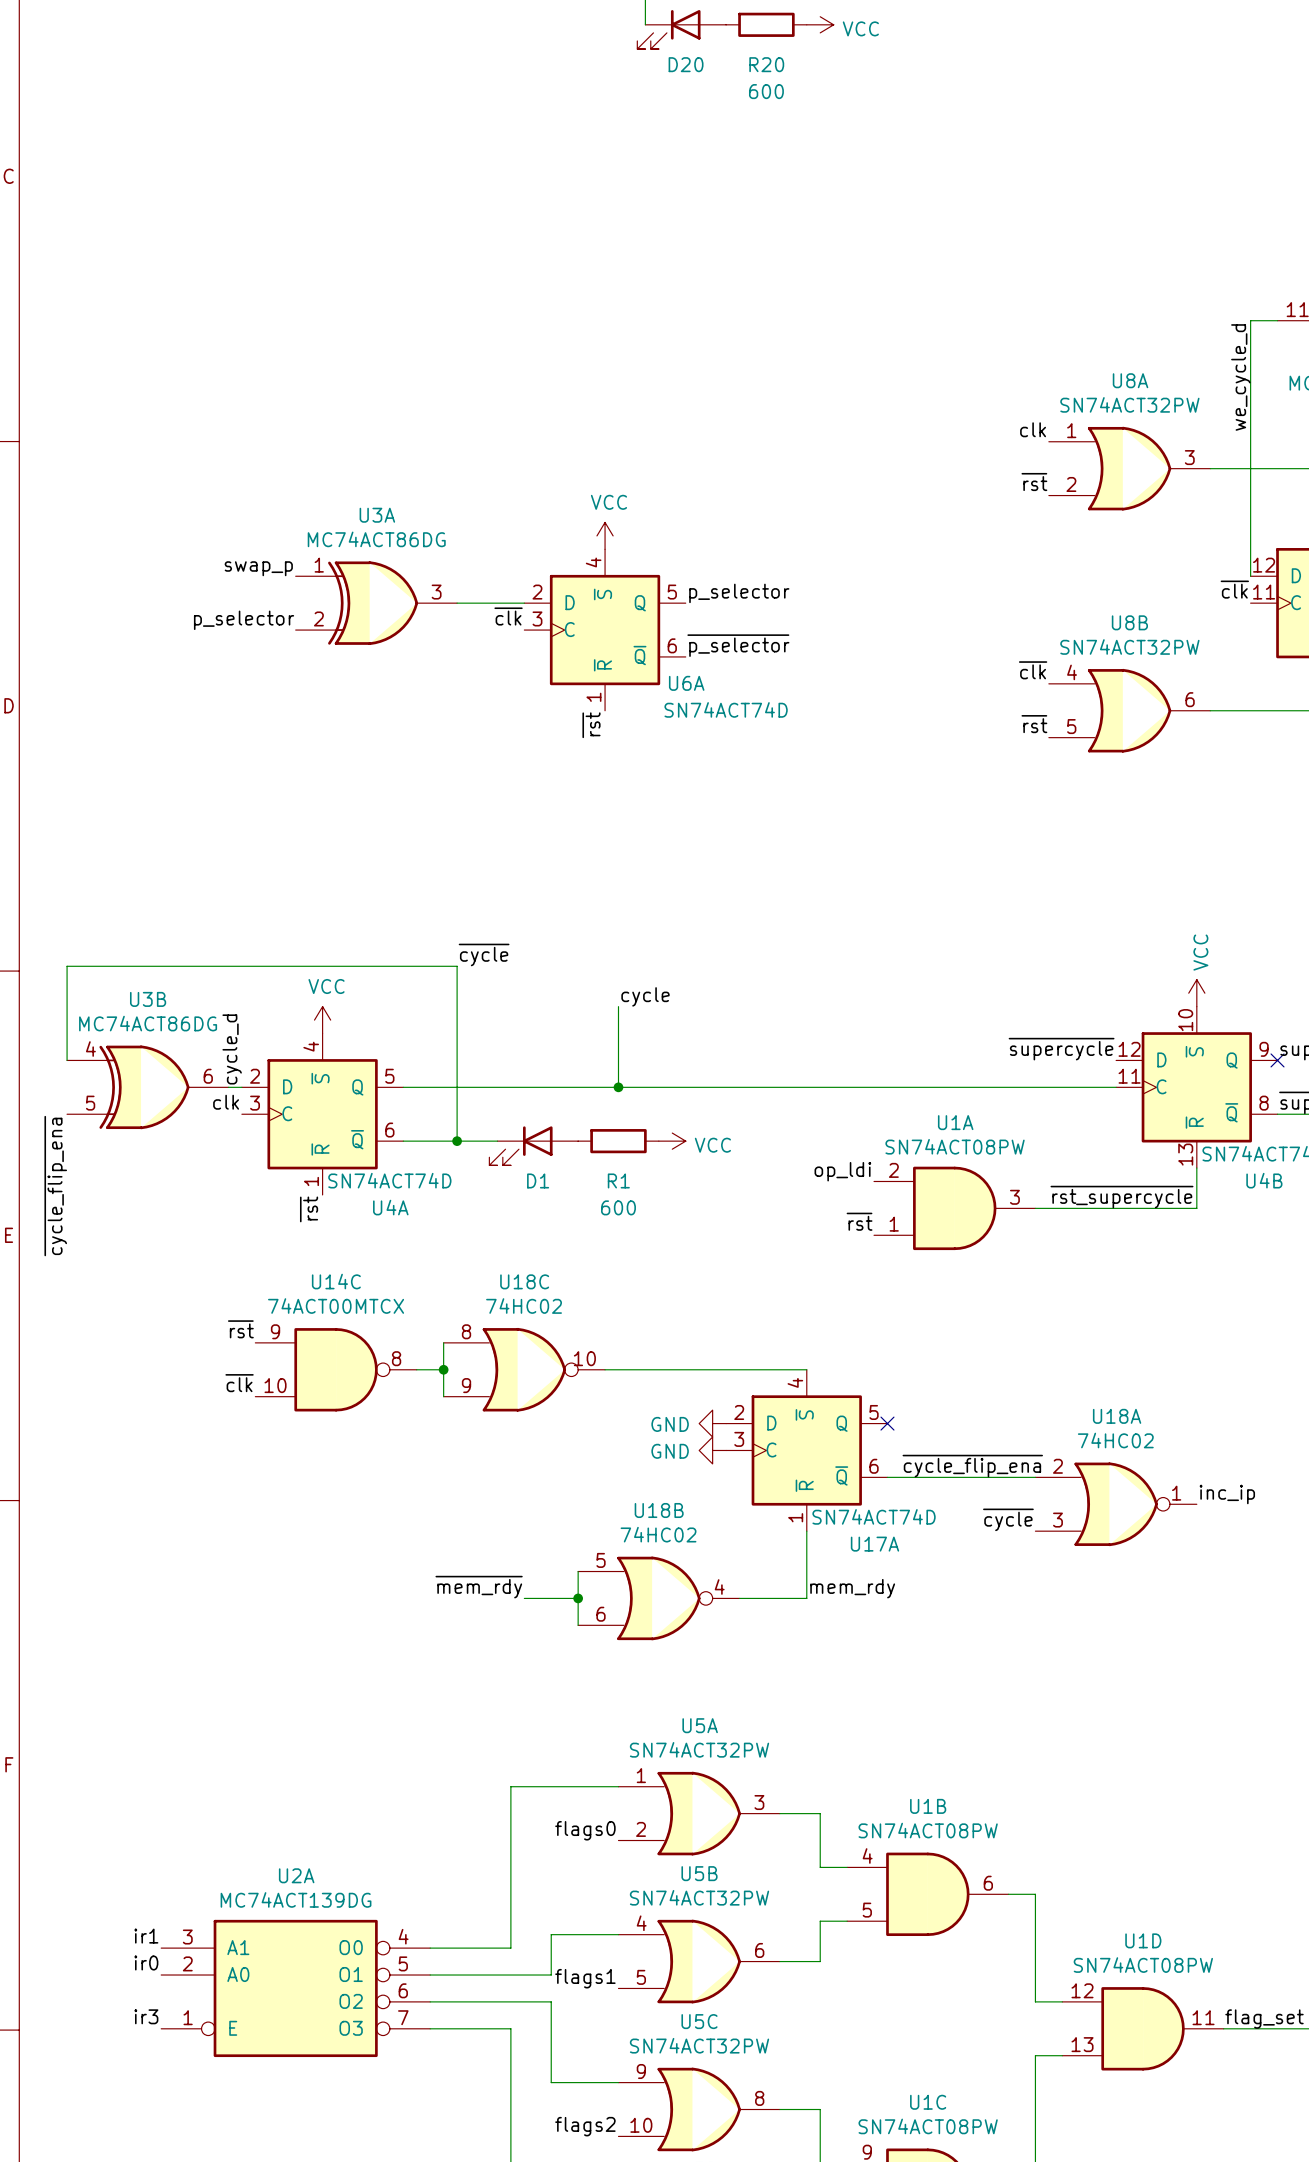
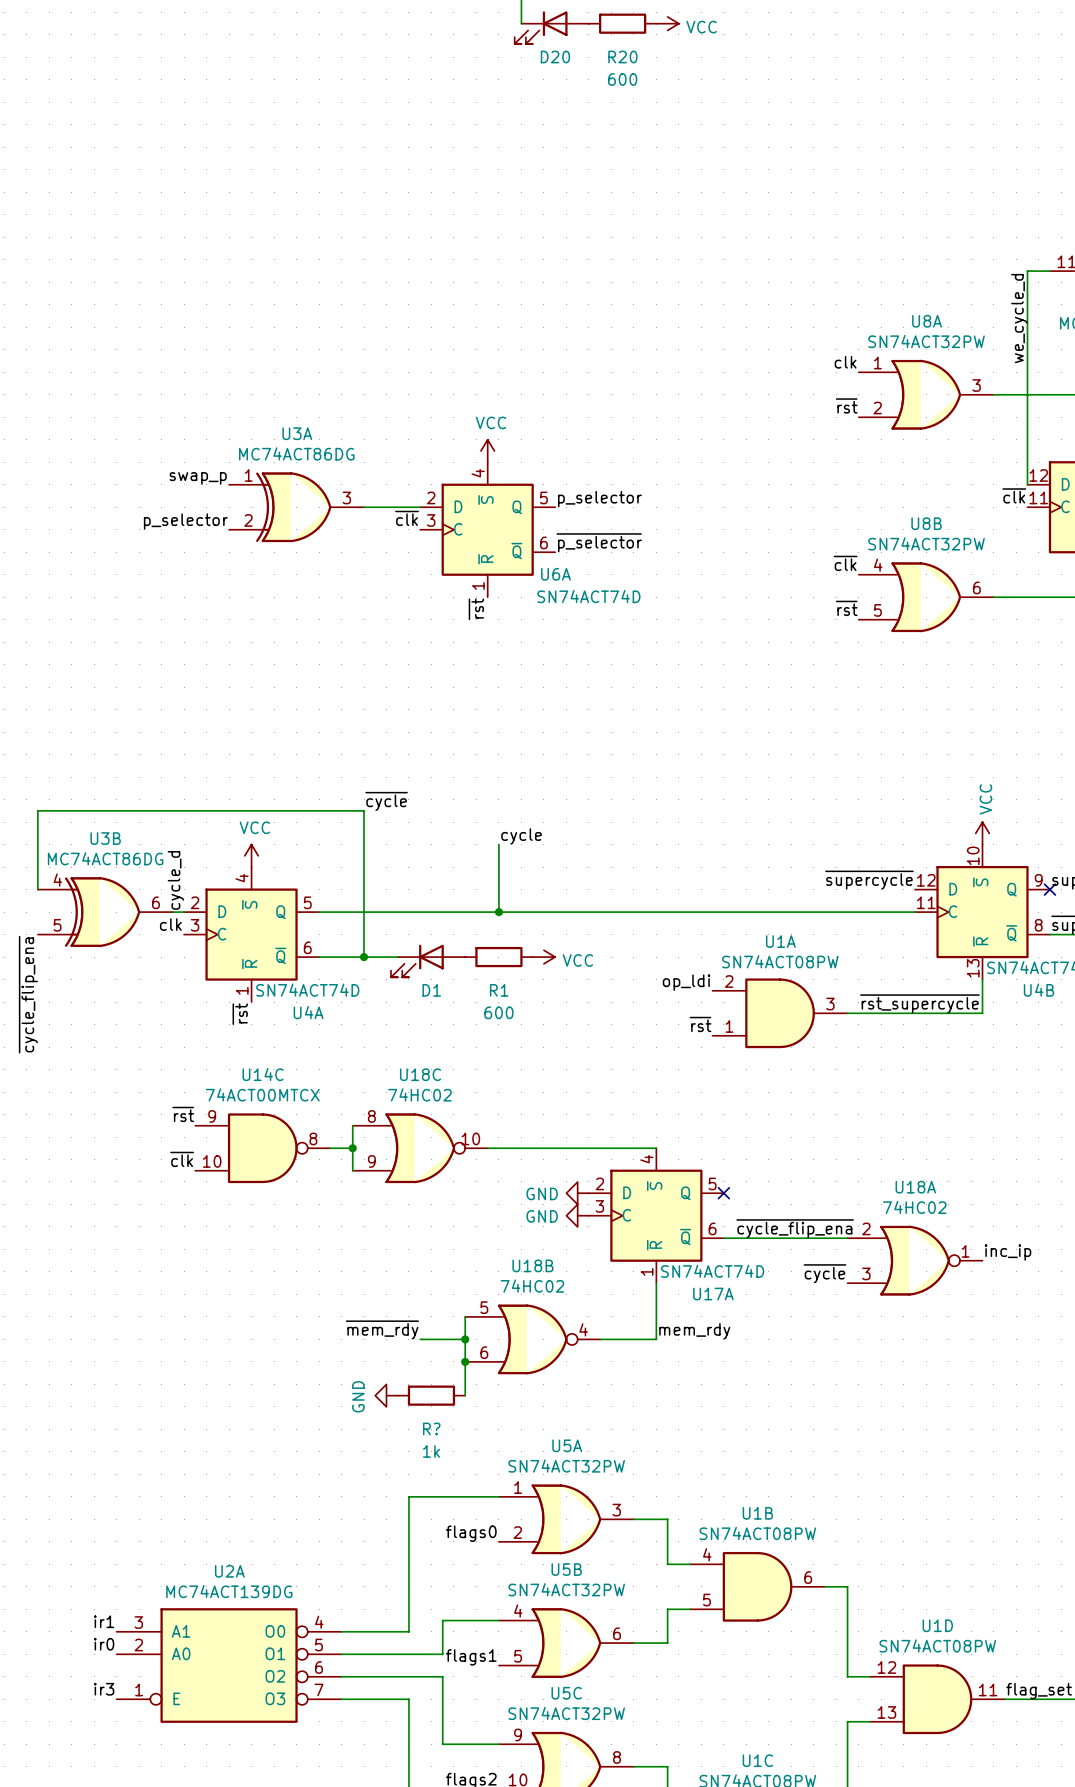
wire: none -> (465, 1361) (465, 1395)
junction: none -> (465, 1361)
power symbol: none -> GND (386, 1395)
R?: none -> 1k (431, 1395)

